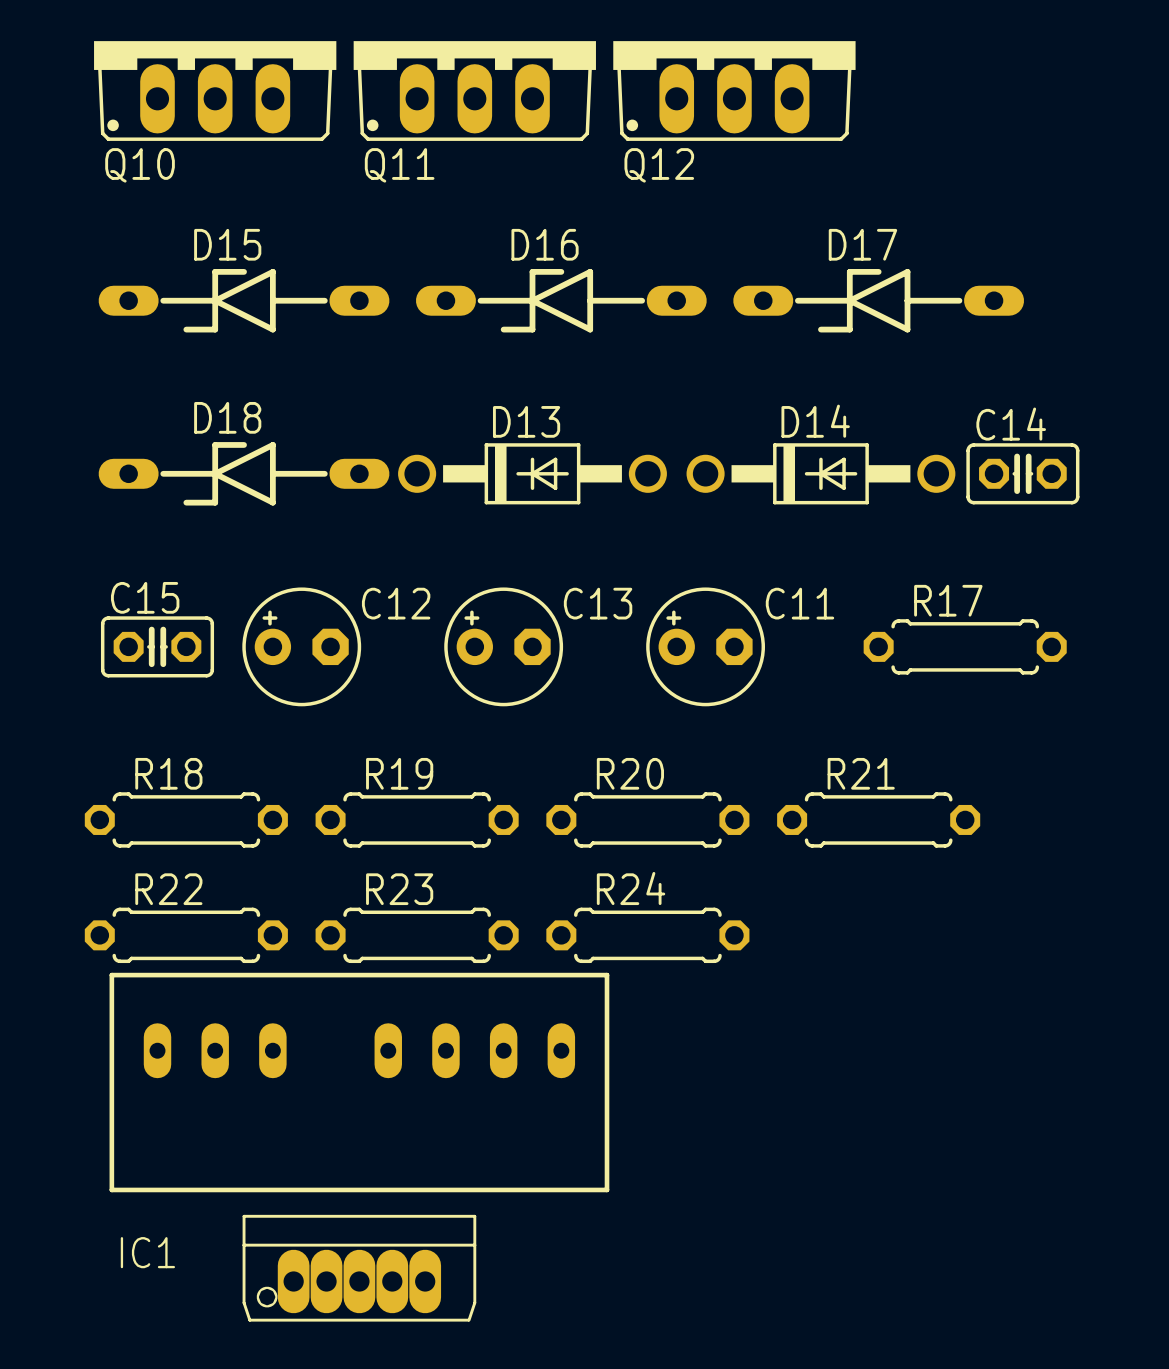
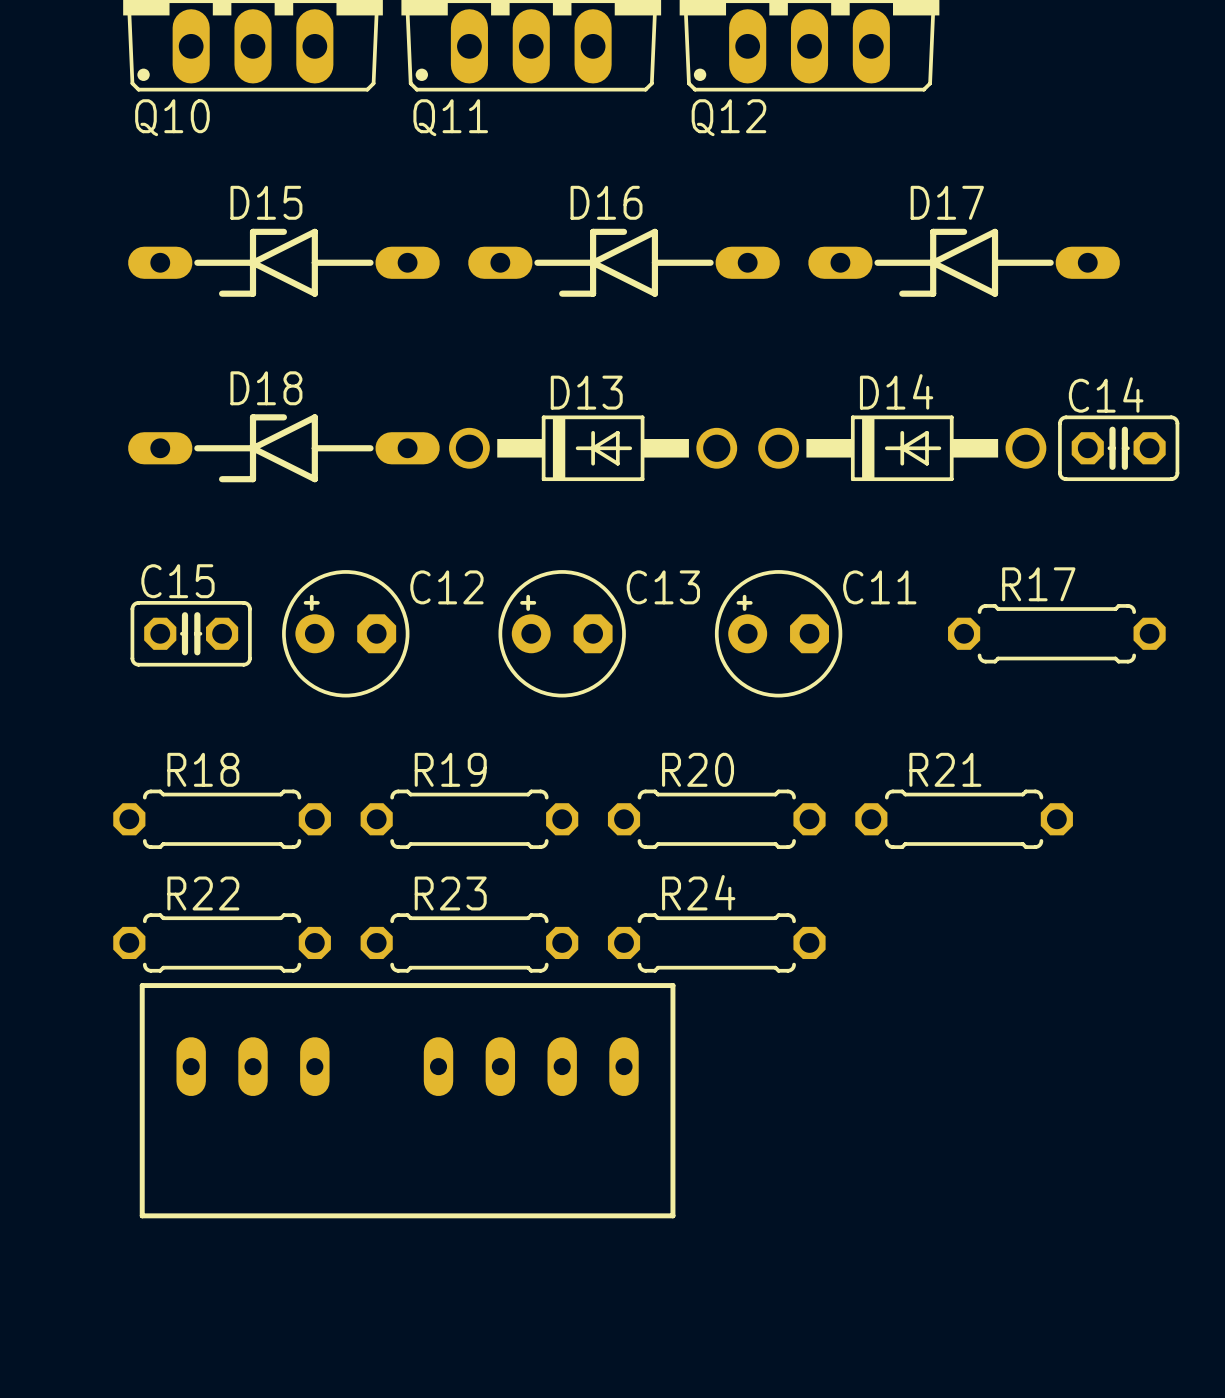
IC1: (359, 1268) -> none

